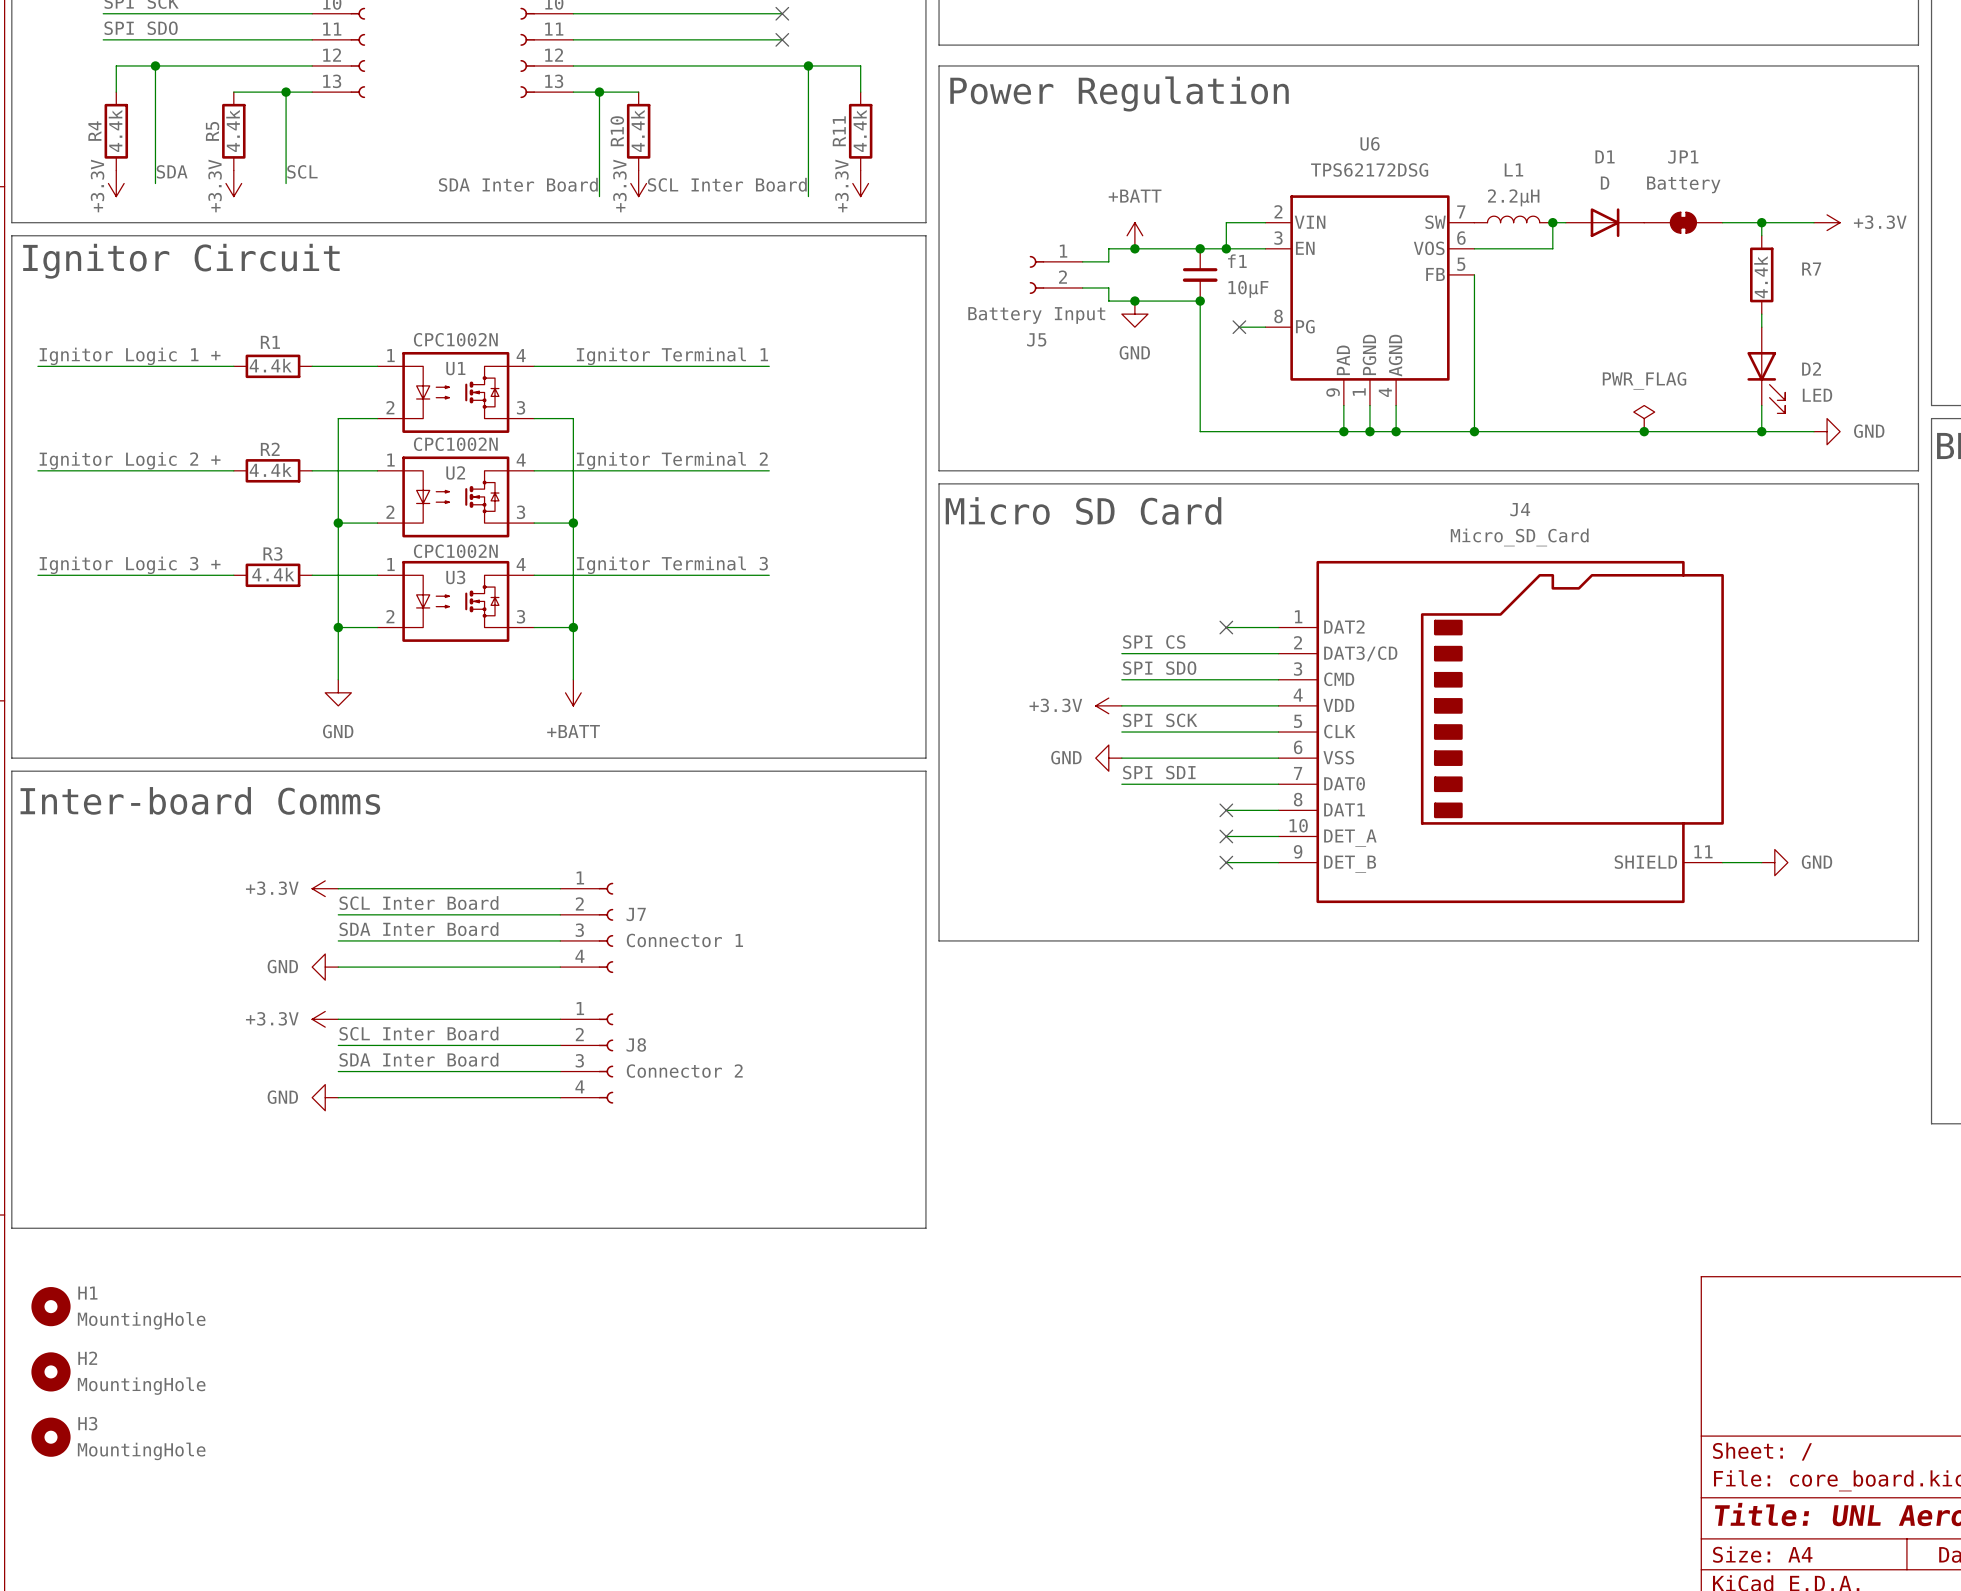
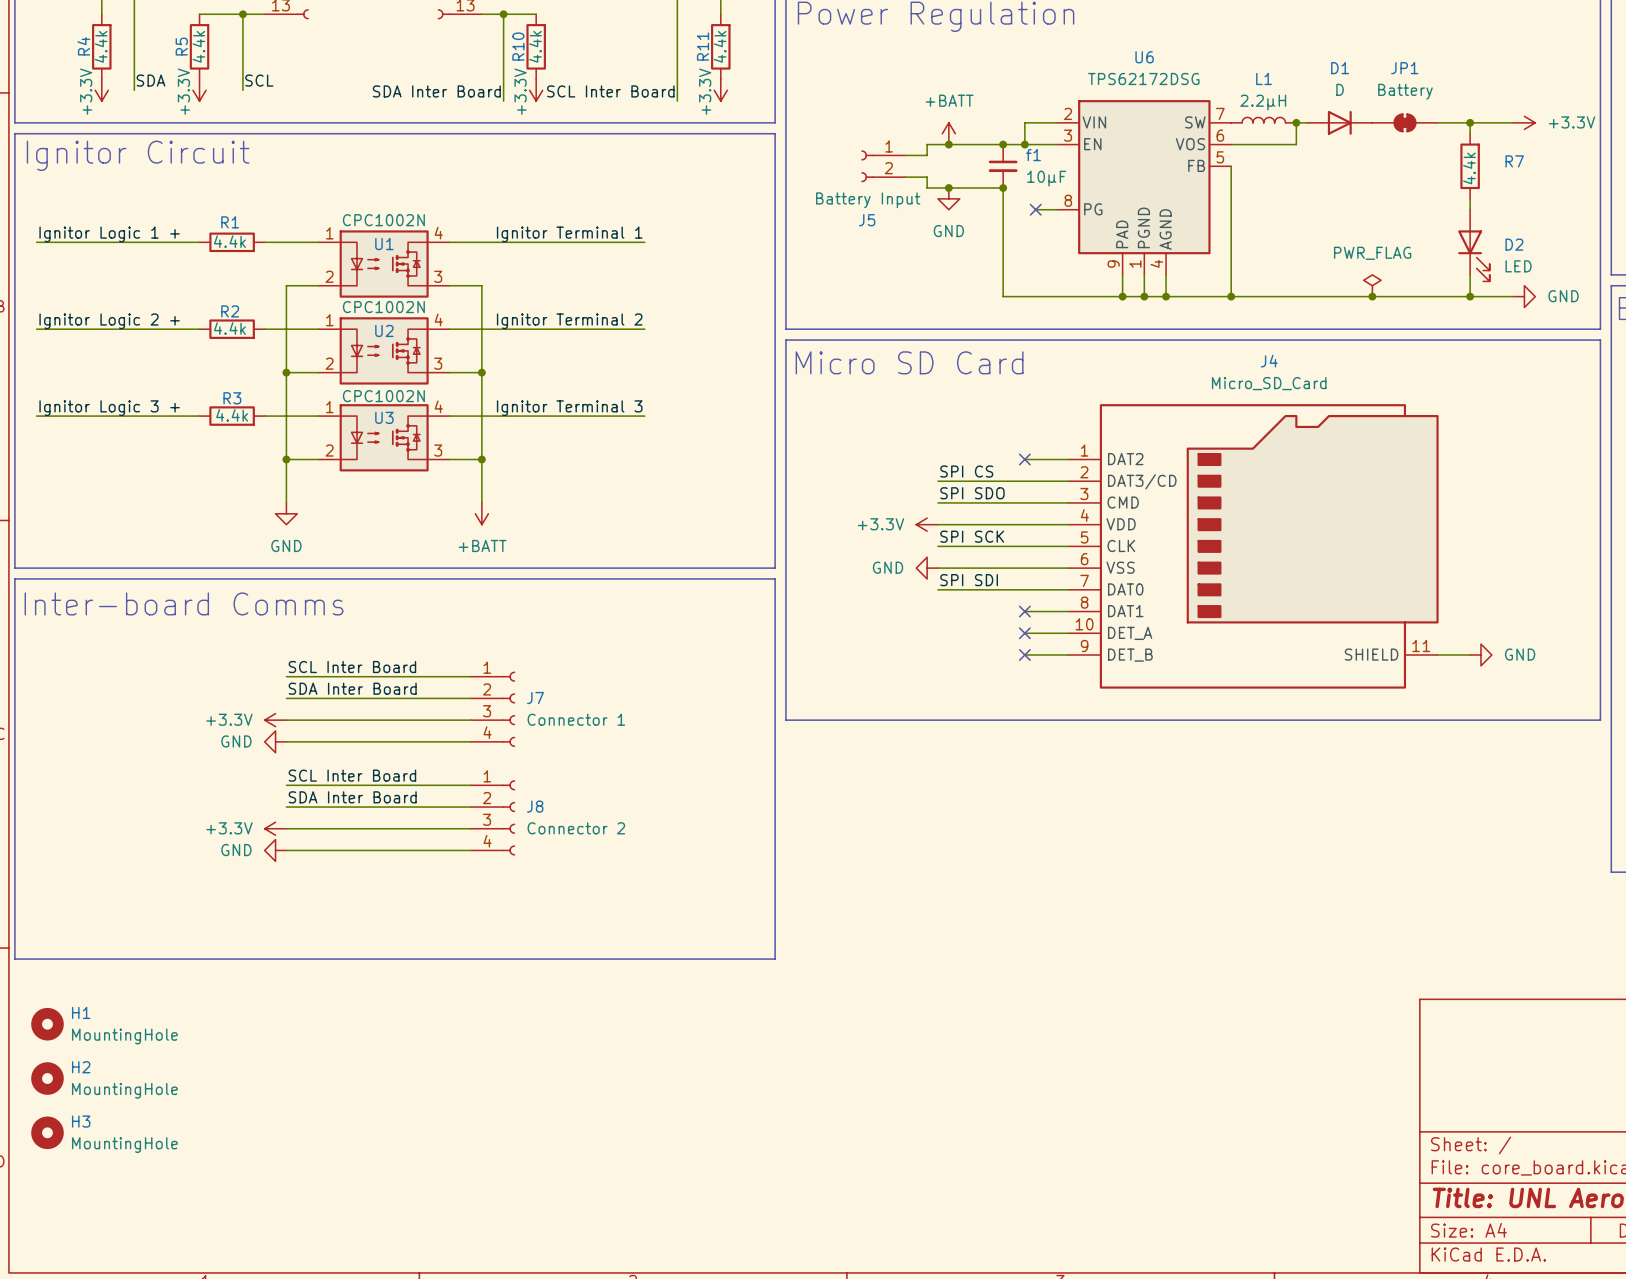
label: none -> SCL Inter Board (352, 667)
power symbol: +3.3V (325, 888) -> none
label: SCL Inter Board (418, 903) -> SDA Inter Board (352, 688)
label: SDA Inter Board (418, 929) -> none
power symbol: none -> +3.3V (275, 720)
label: none -> SCL Inter Board (352, 775)
power symbol: +3.3V (325, 1019) -> none
label: SCL Inter Board (418, 1033) -> SDA Inter Board (352, 797)
label: SDA Inter Board (418, 1059) -> none
power symbol: none -> +3.3V (275, 828)

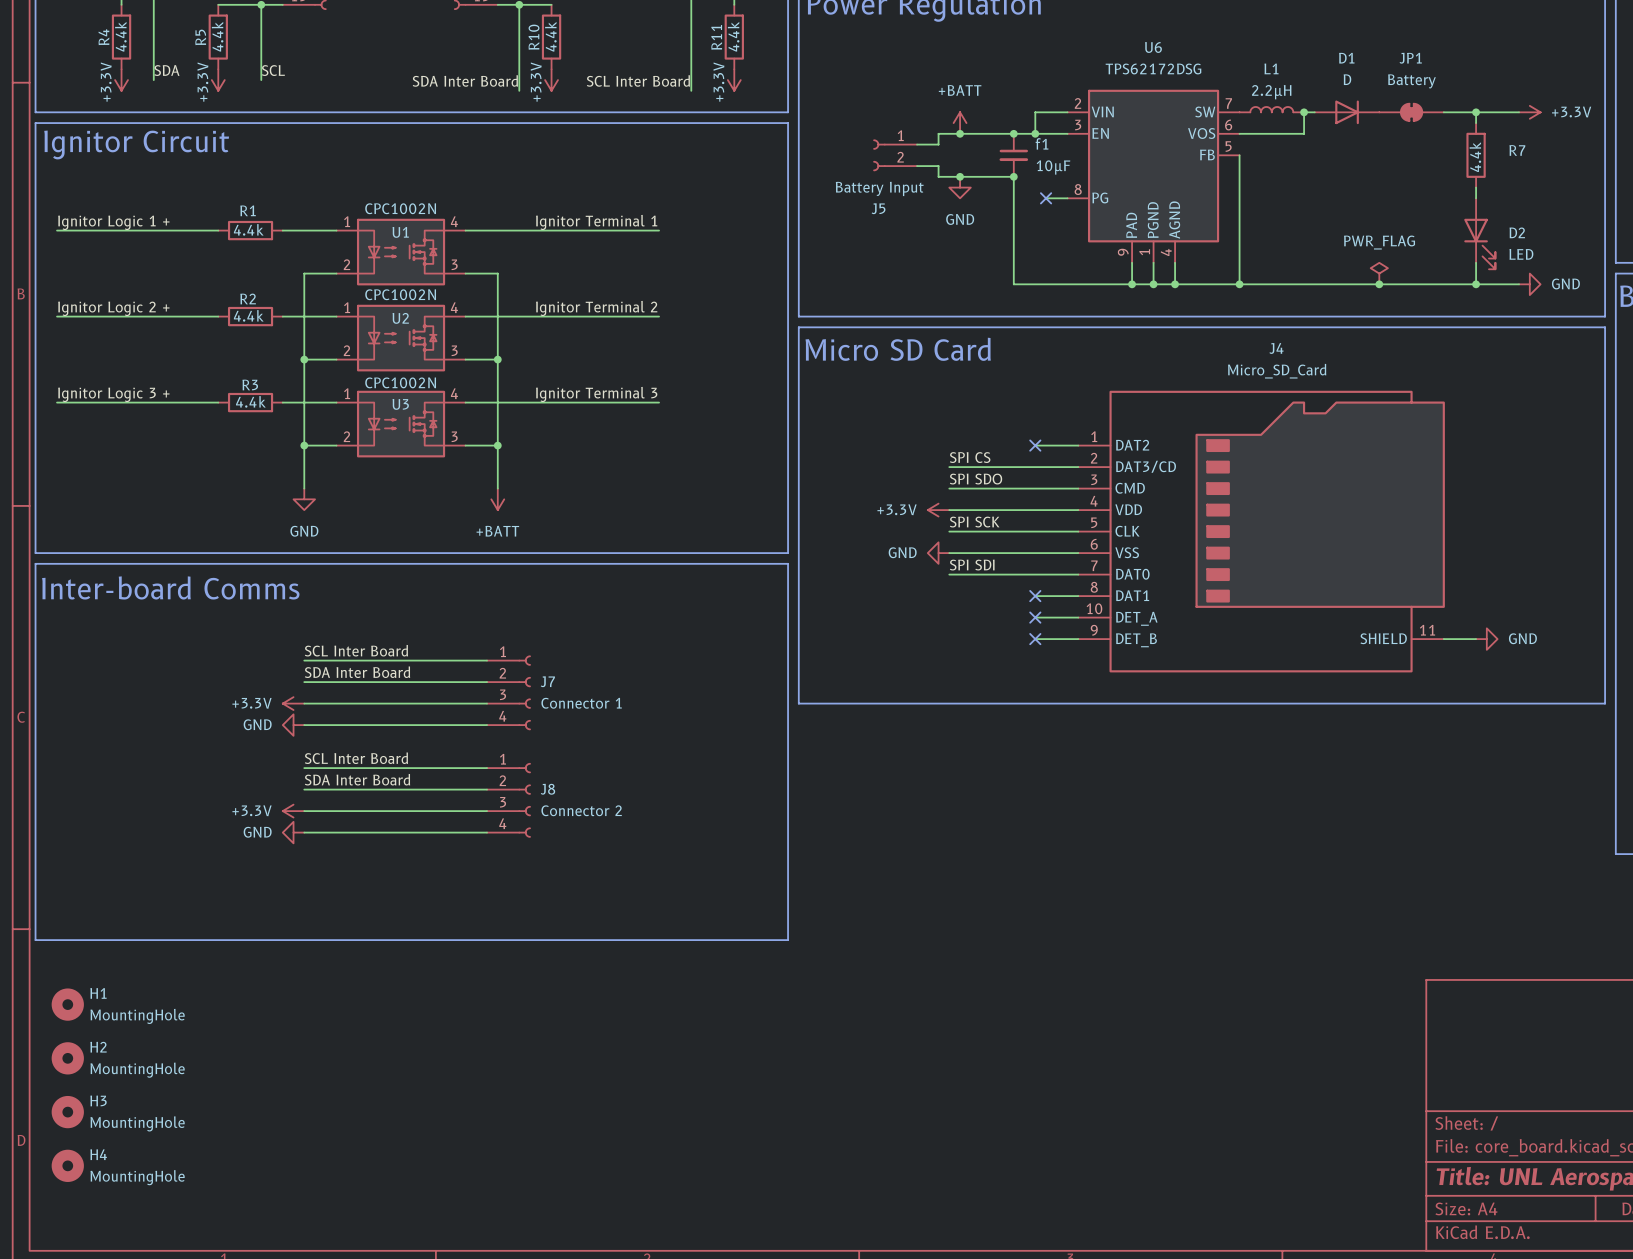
H4: none -> MountingHole (67, 1165)

